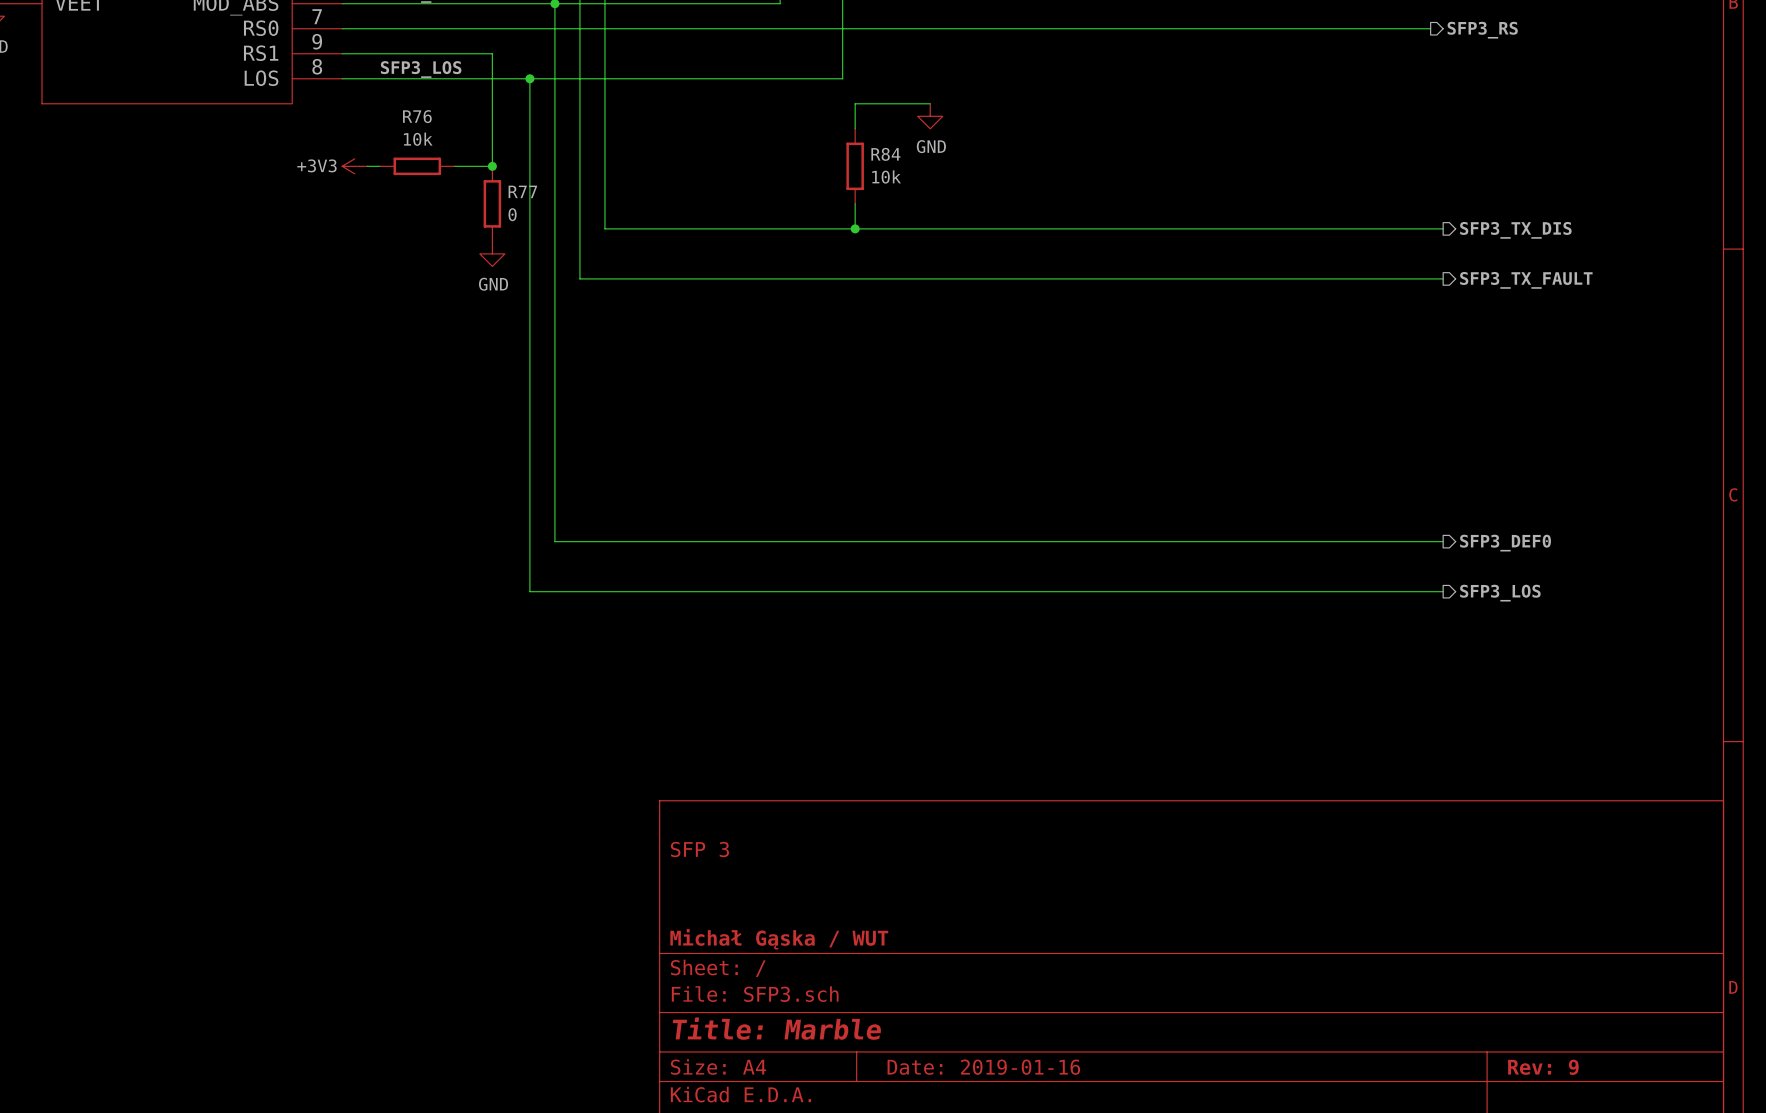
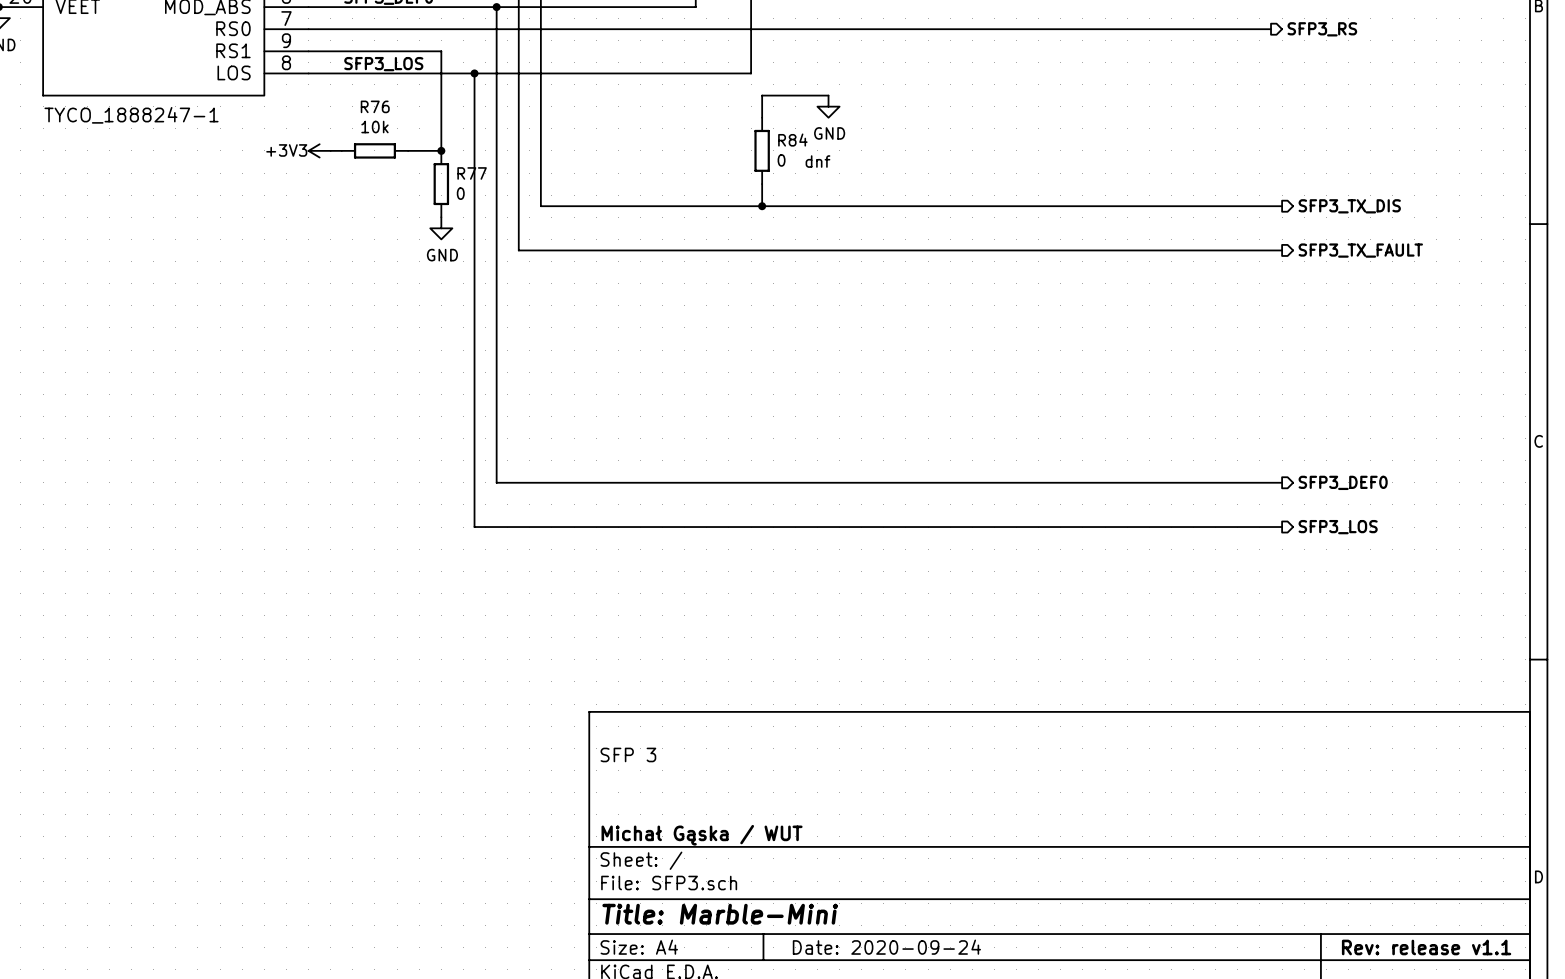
part value: none -> TYCO_1888247-1 (131, 115)
R84 text: 10k (886, 176) -> none
R84 text: none -> 0 (781, 160)
R84 text: none -> dnf (817, 161)
title block: Title: Marble (777, 1028) -> Title: Marble-Mini (720, 914)
title block: Date: 2019-01-16 (983, 1067) -> Date: 2020-09-24 (886, 947)
title block: Rev: 9 (1543, 1067) -> Rev: release v1.1 (1426, 947)

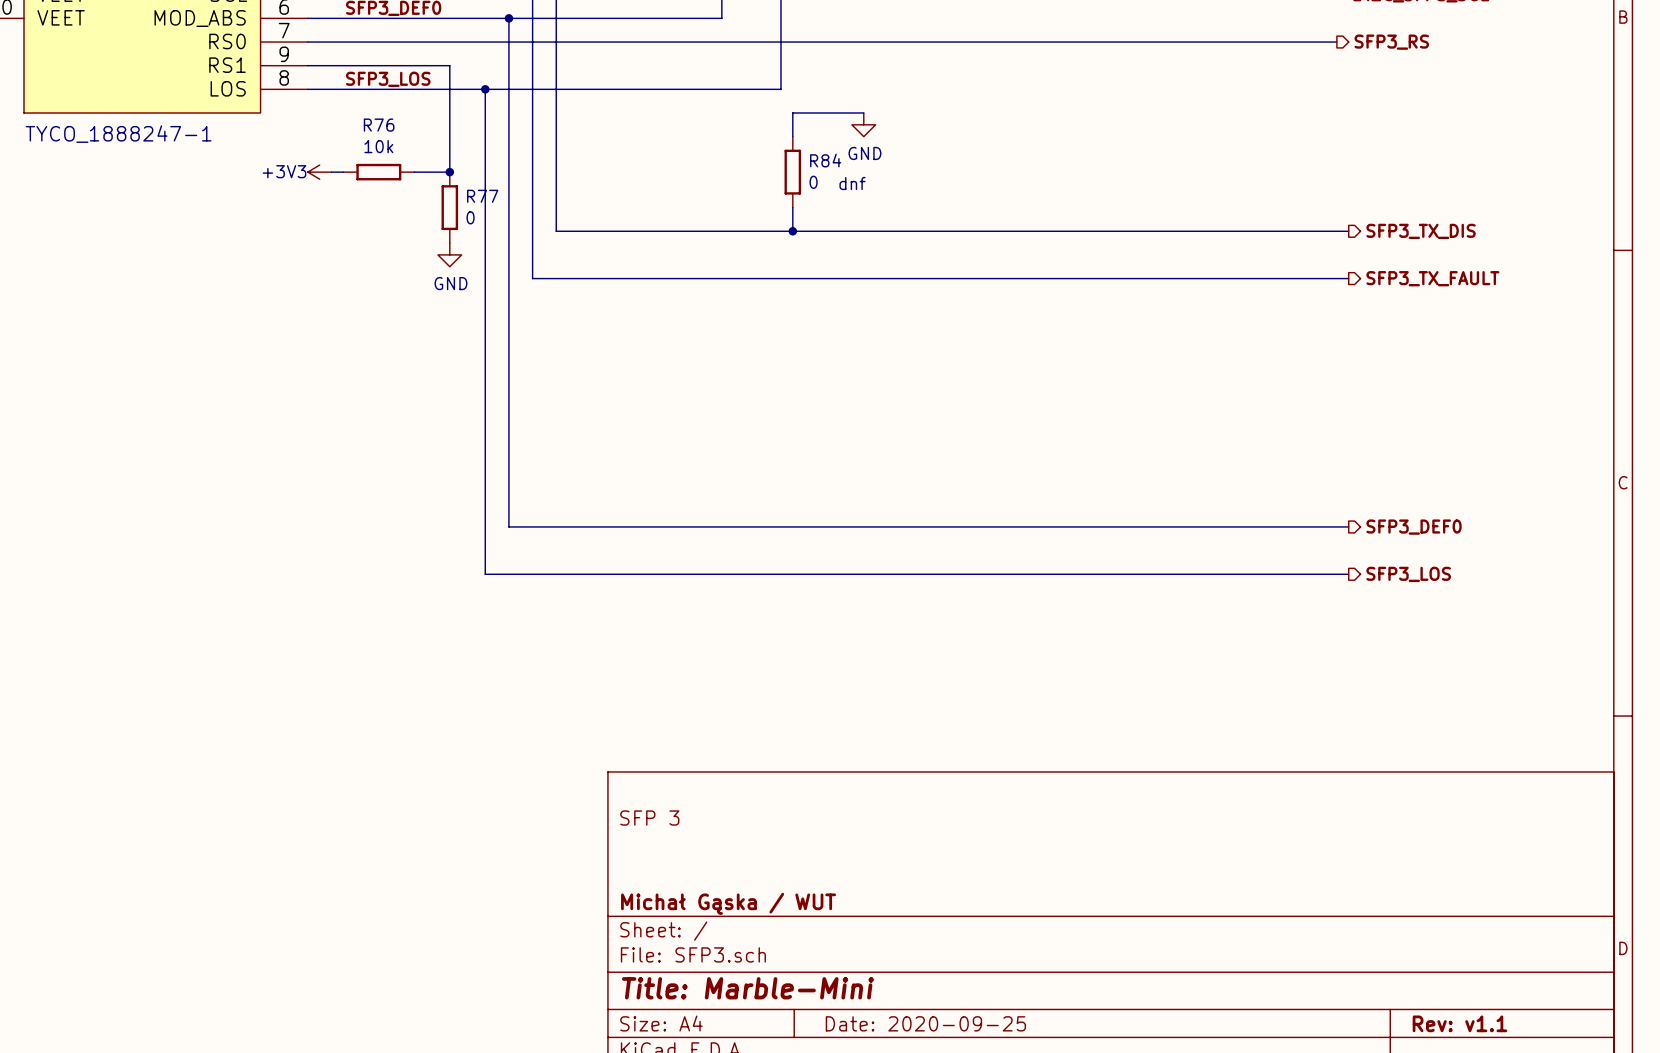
title block: Date: 2020-09-24 (886, 947) -> Date: 2020-09-25 (925, 1023)
title block: Rev: release v1.1 (1426, 947) -> Rev: v1.1 (1459, 1023)

